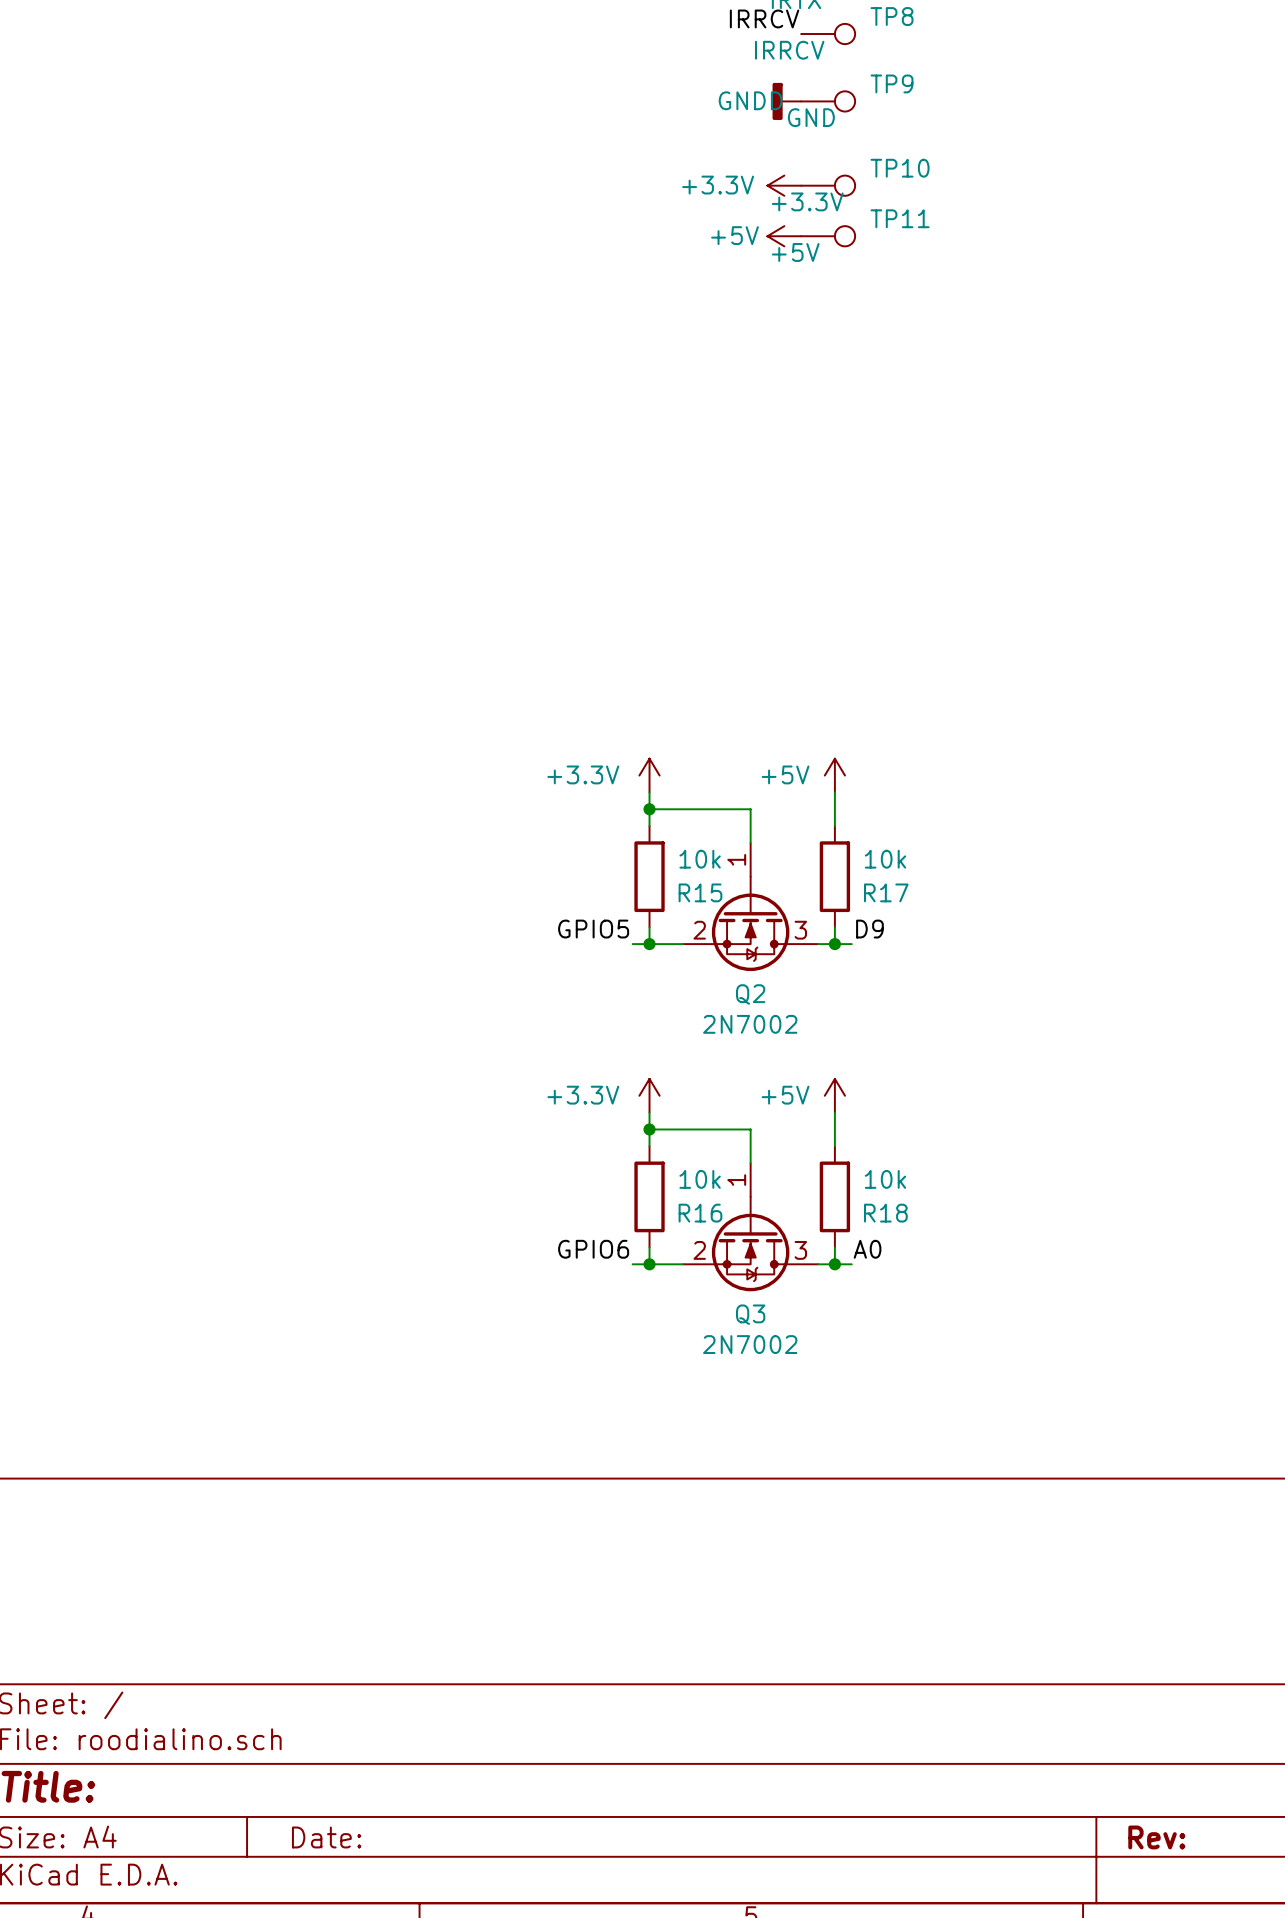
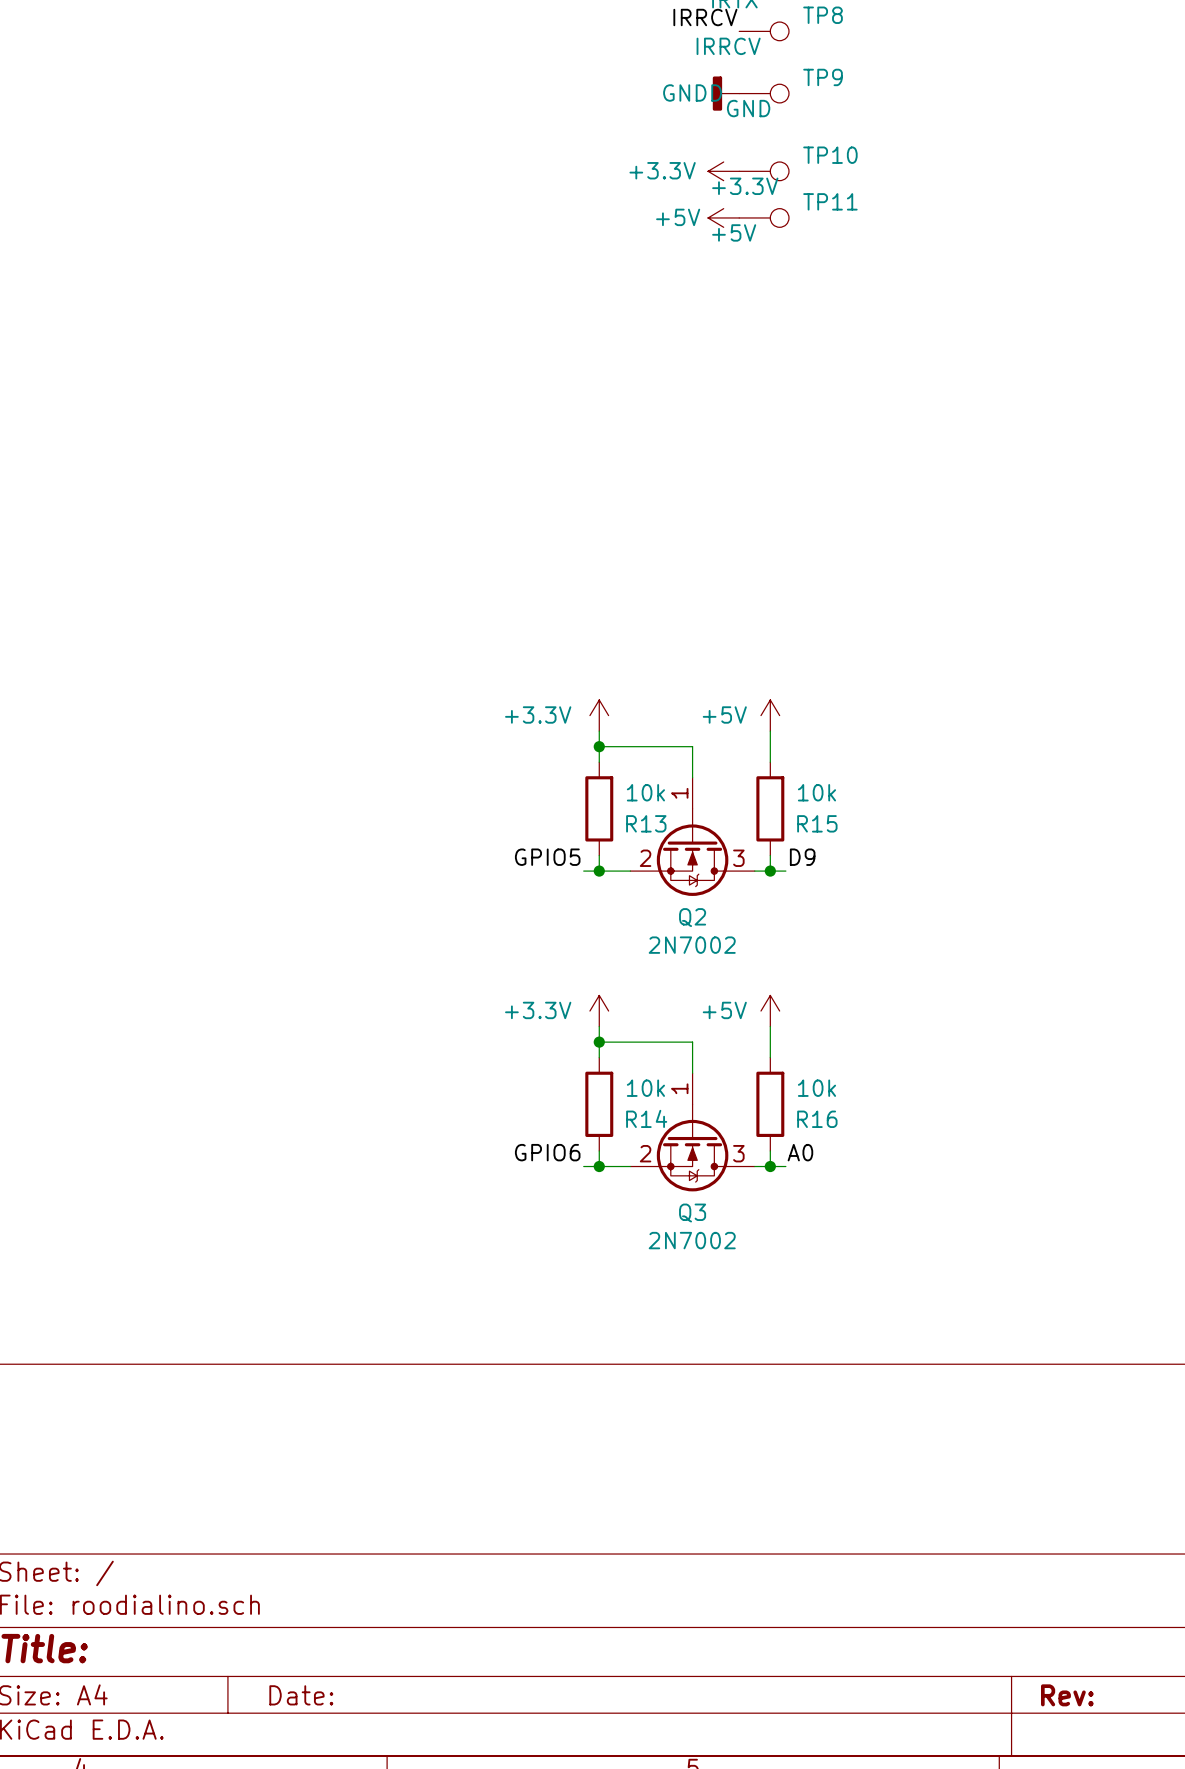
R15 name: R15 (700, 892) -> R13 (646, 823)
R17 name: R17 (886, 892) -> R15 (817, 823)
R16 name: R16 (700, 1213) -> R14 (646, 1118)
R18 name: R18 (885, 1213) -> R16 (817, 1119)

